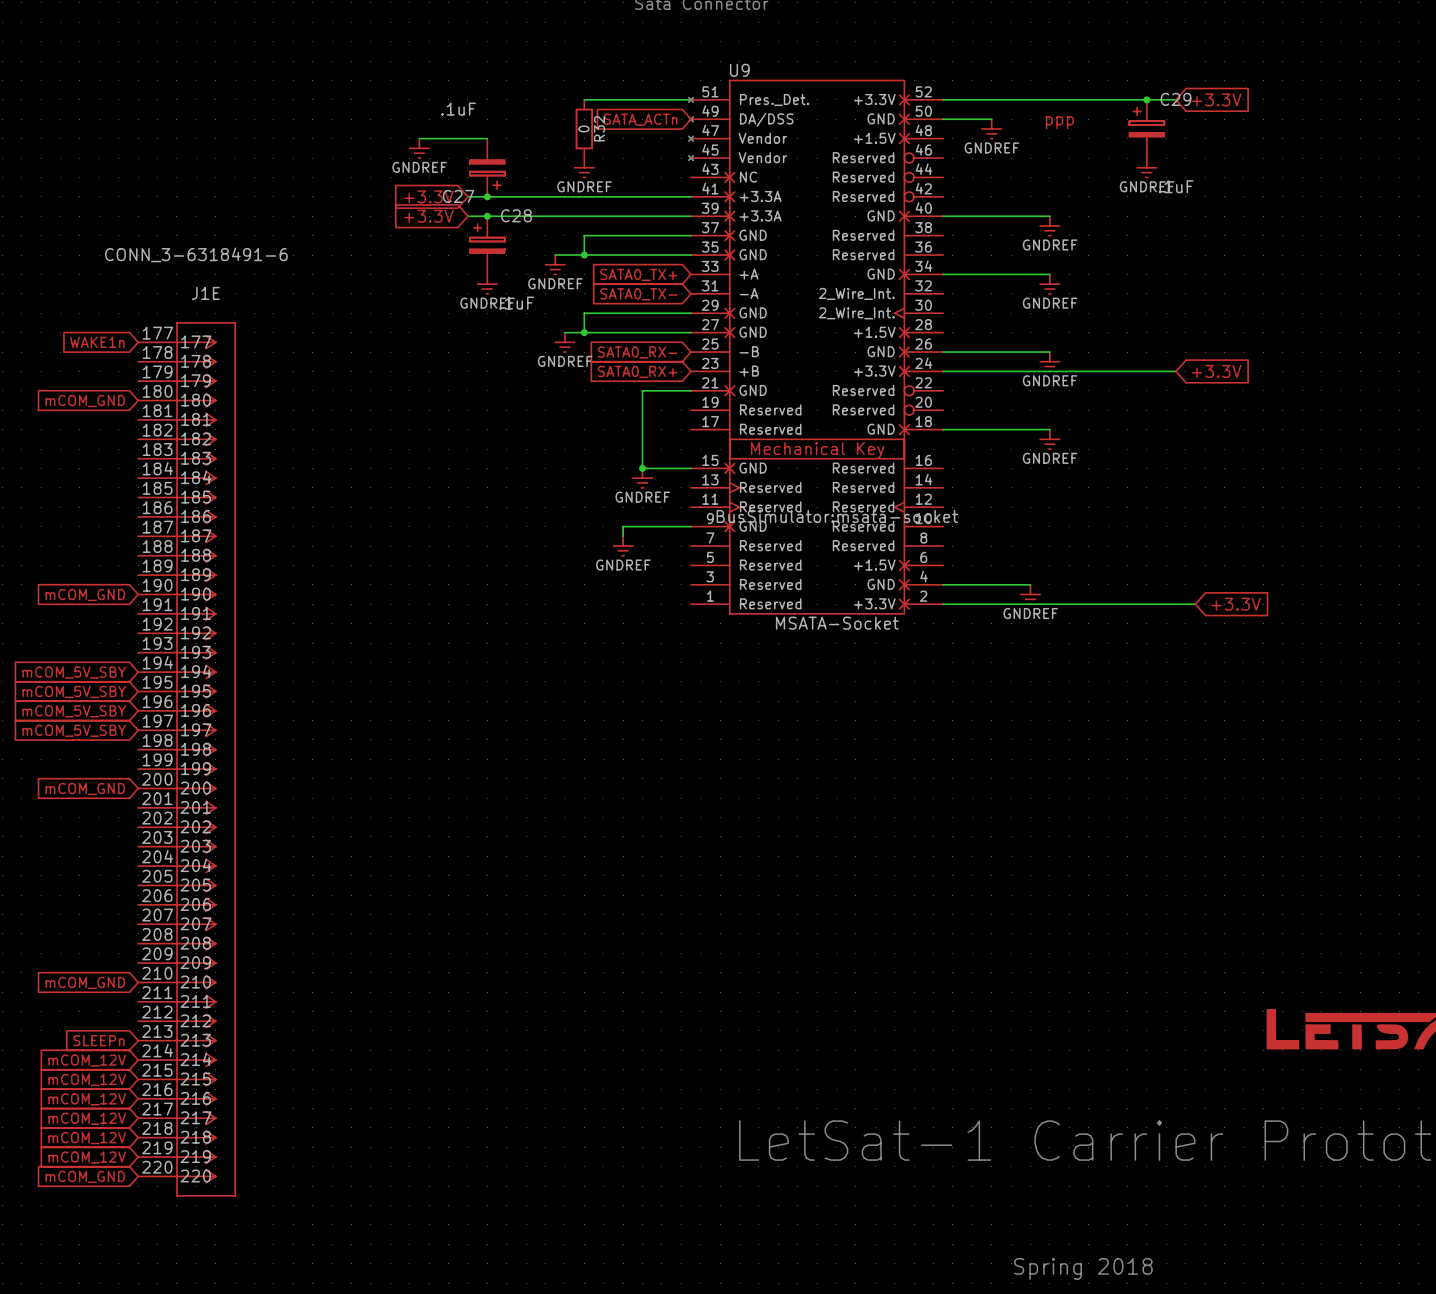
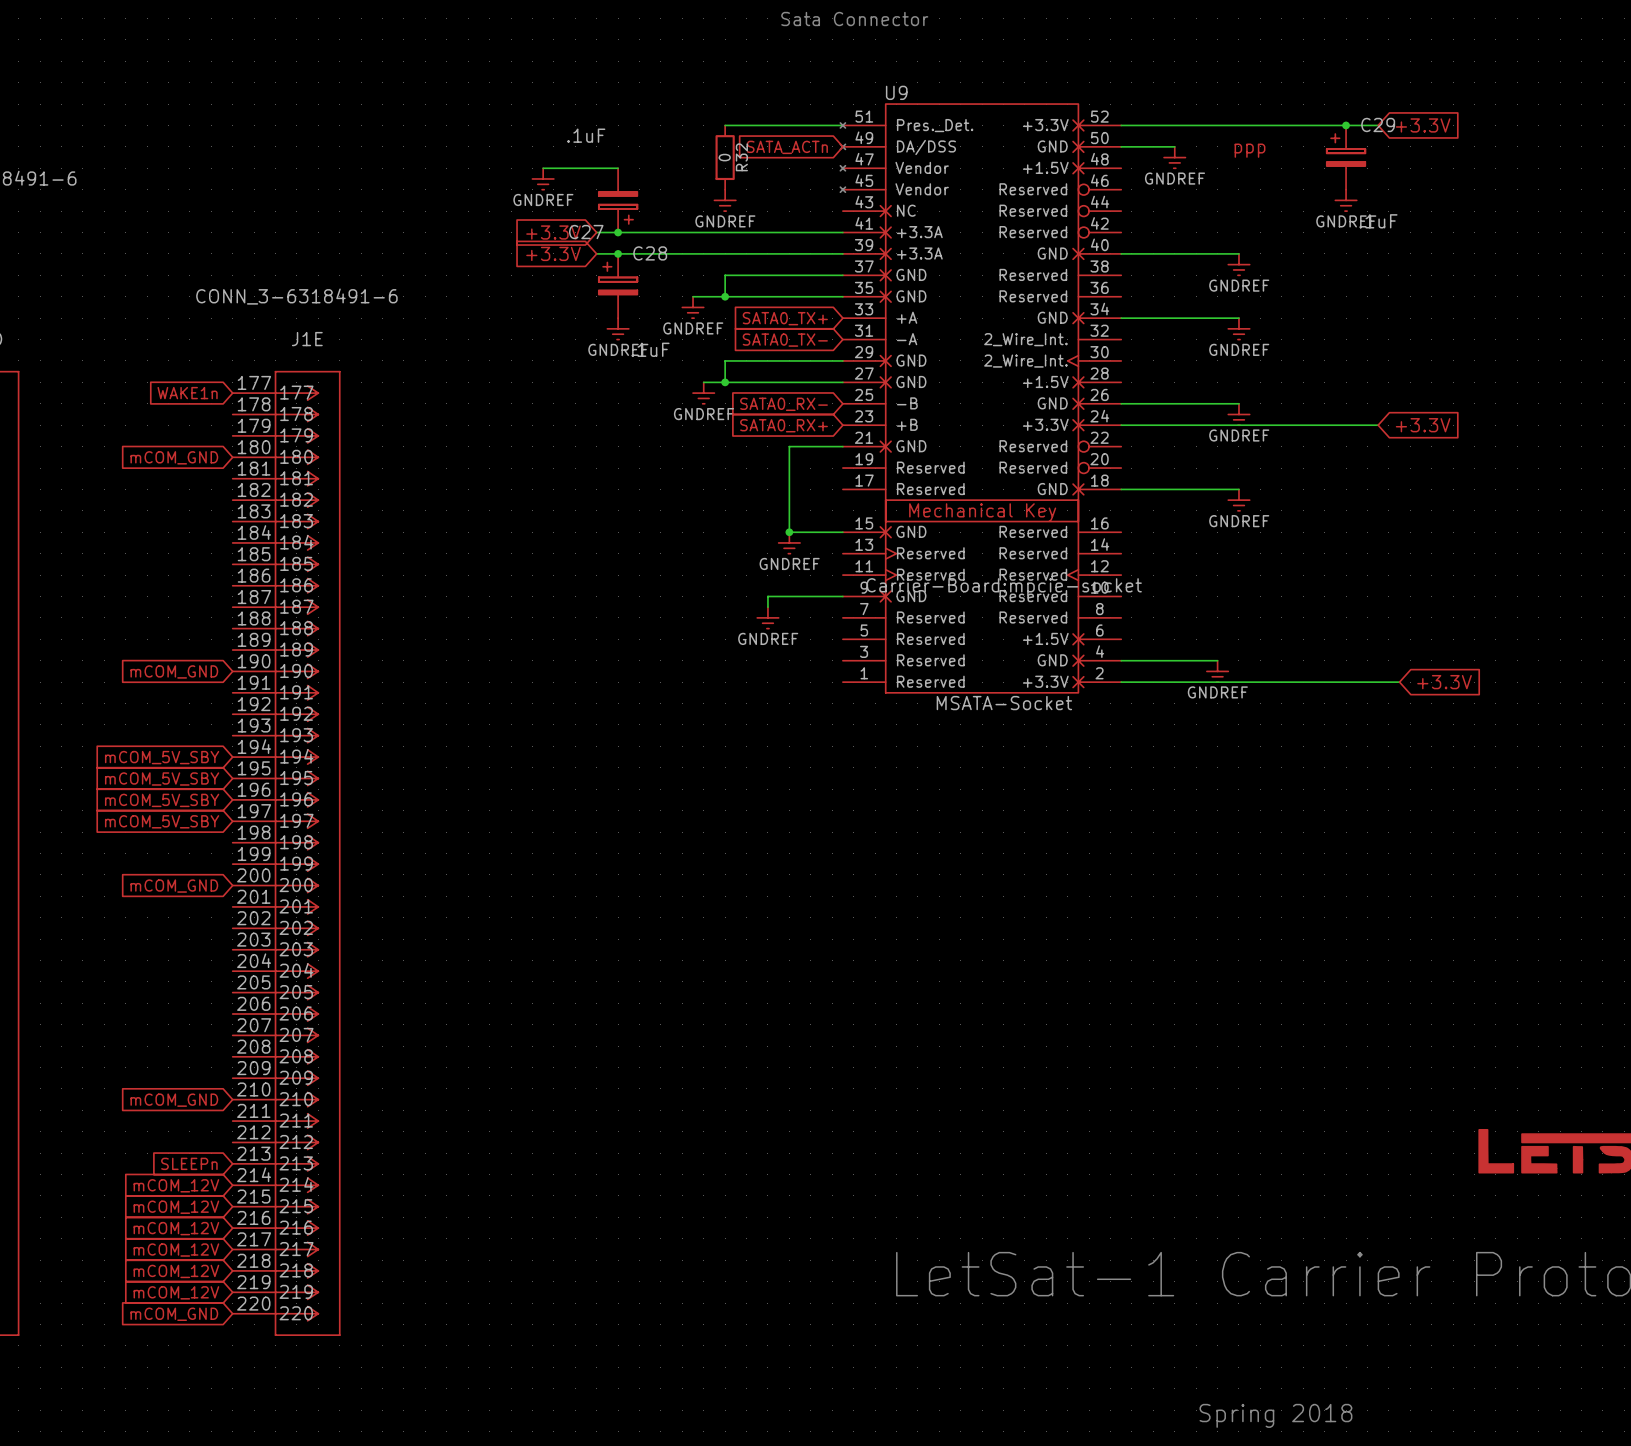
U9 text: BusSimulator:msata-socket (837, 516) -> Carrier-Board:mpcie-socket (1004, 587)

